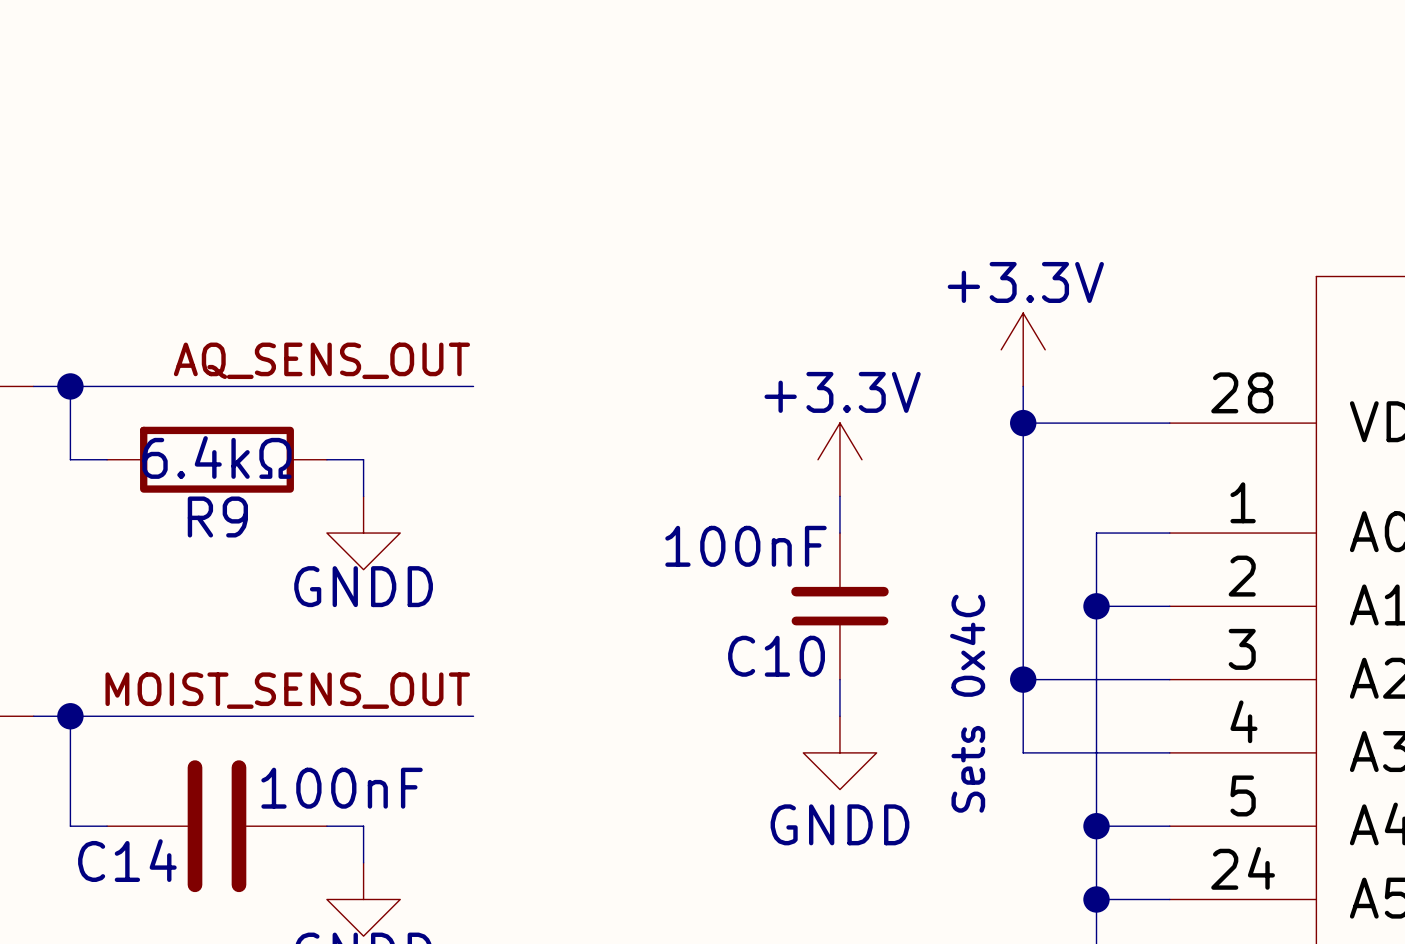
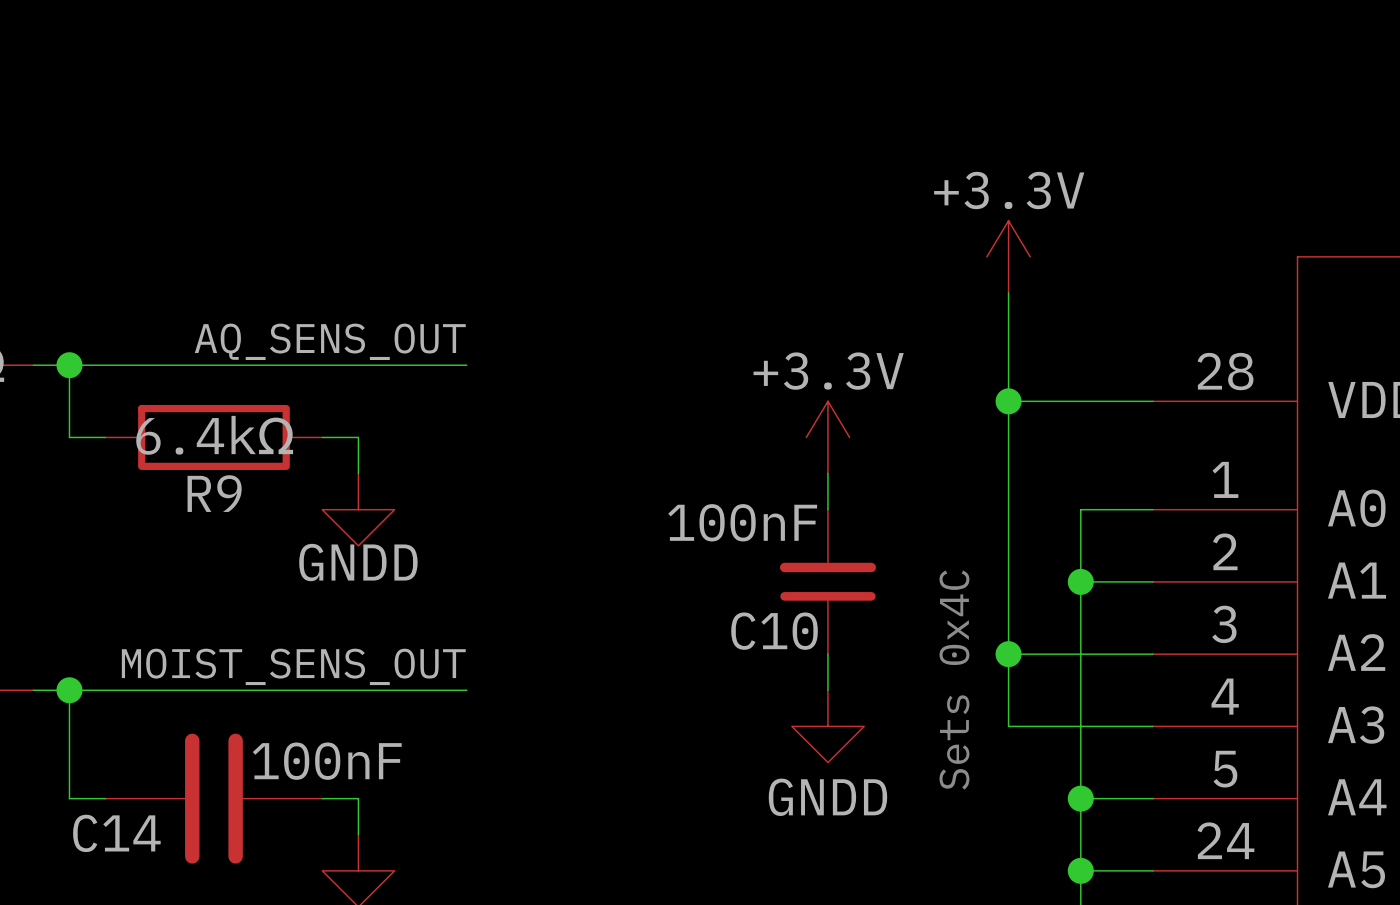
power symbol position: +3.3V (1023, 349) -> +3.3V (1008, 256)

